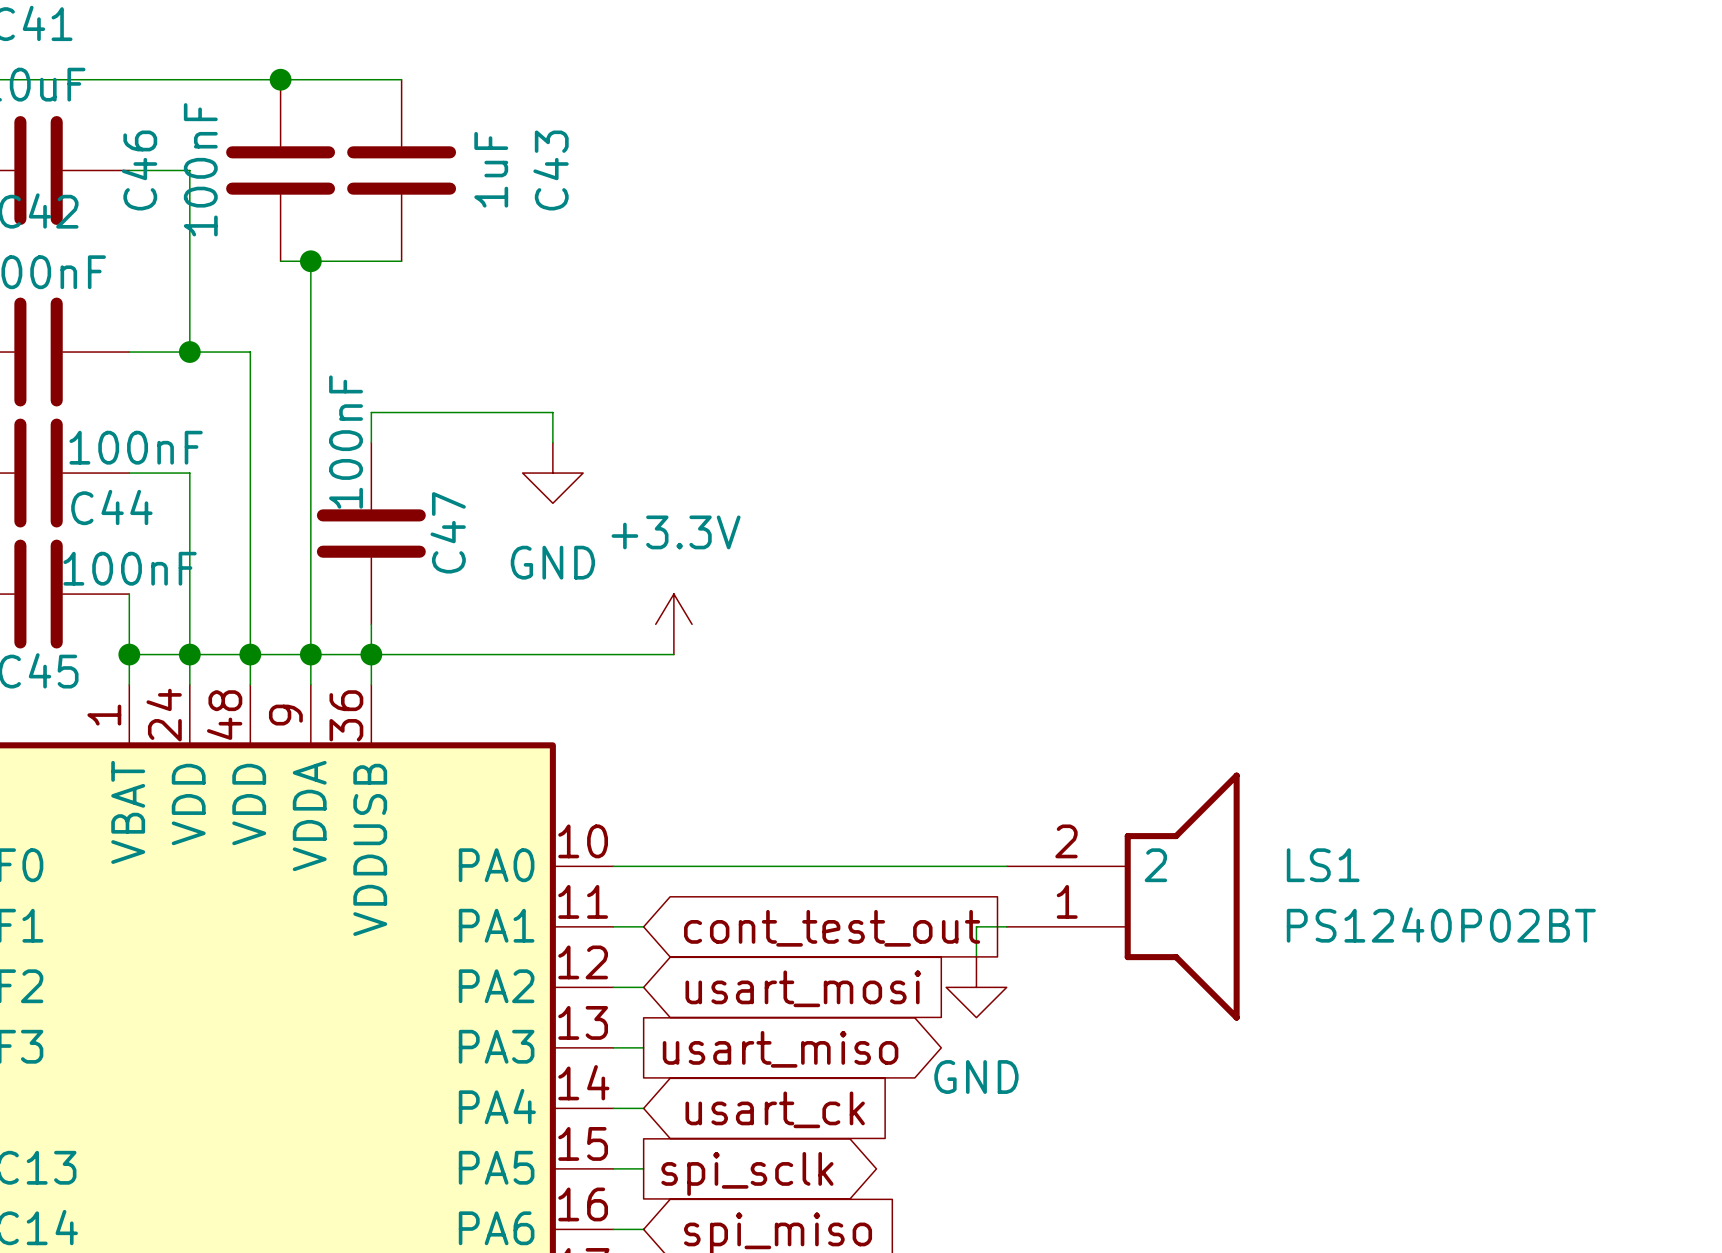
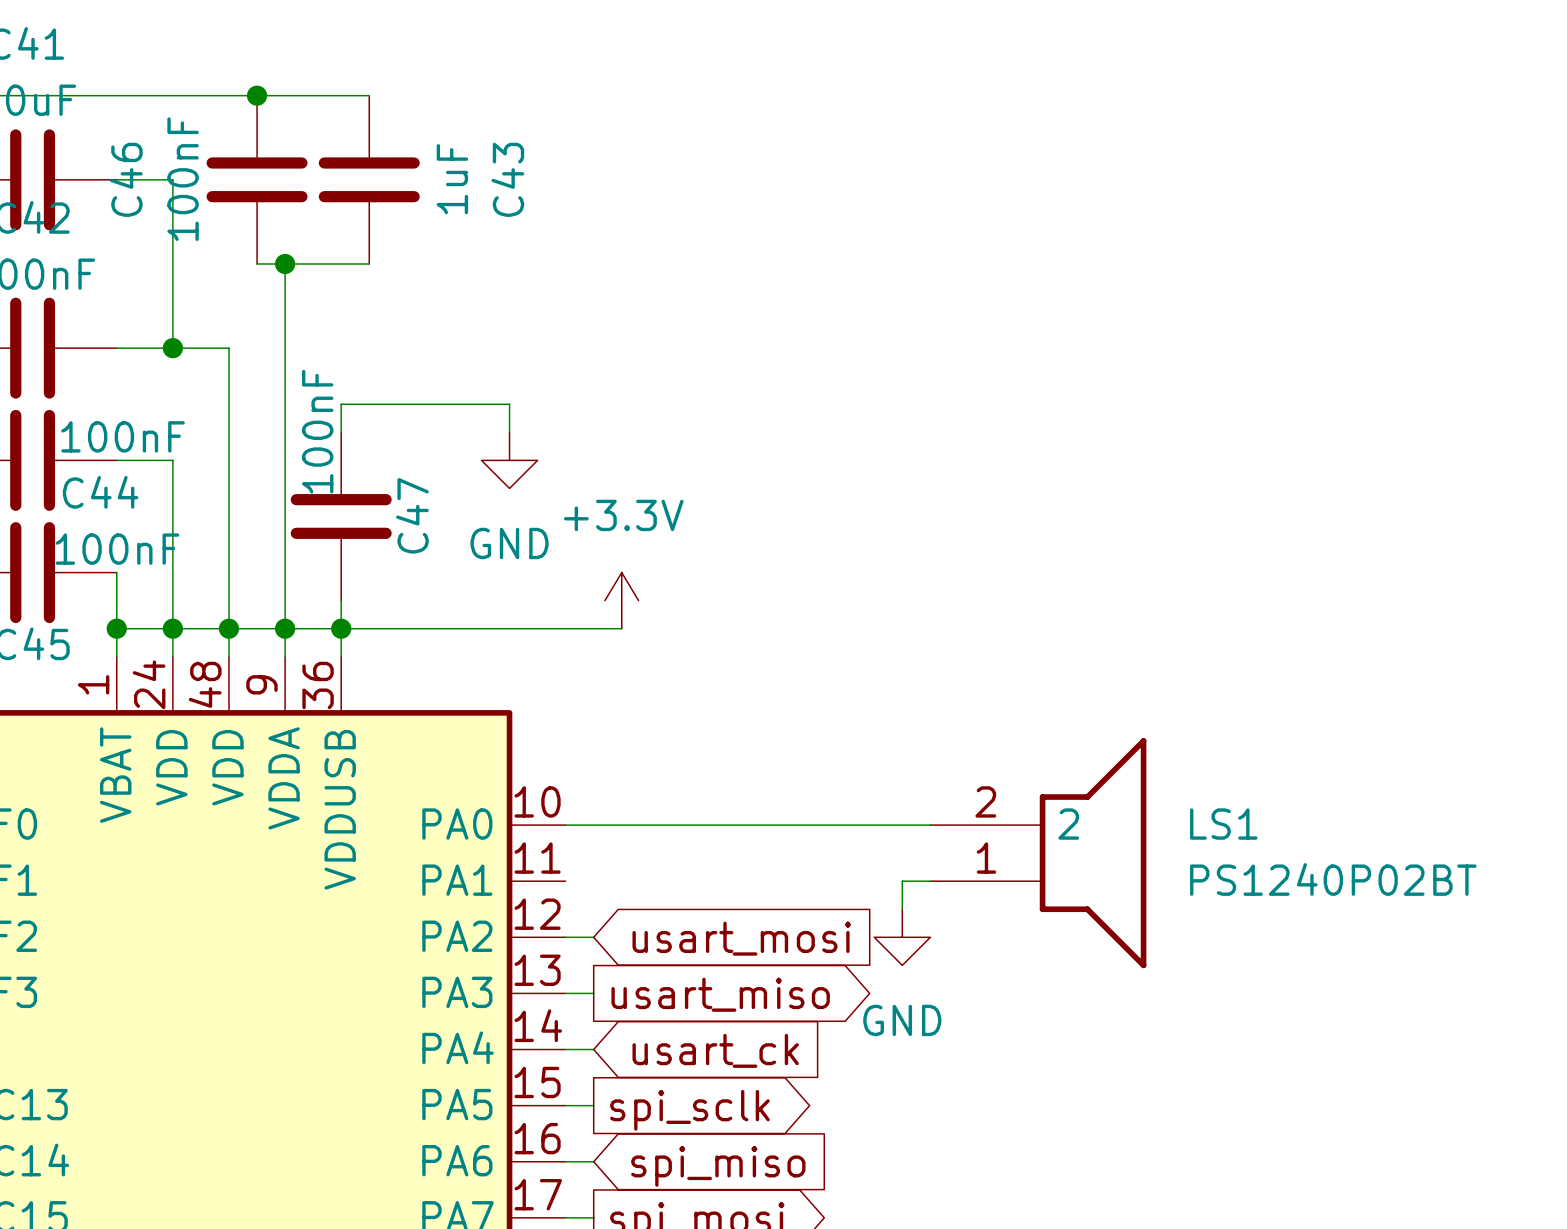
wire: (613, 926) (643, 926) -> none
global label: cont_test_out (832, 928) -> none

